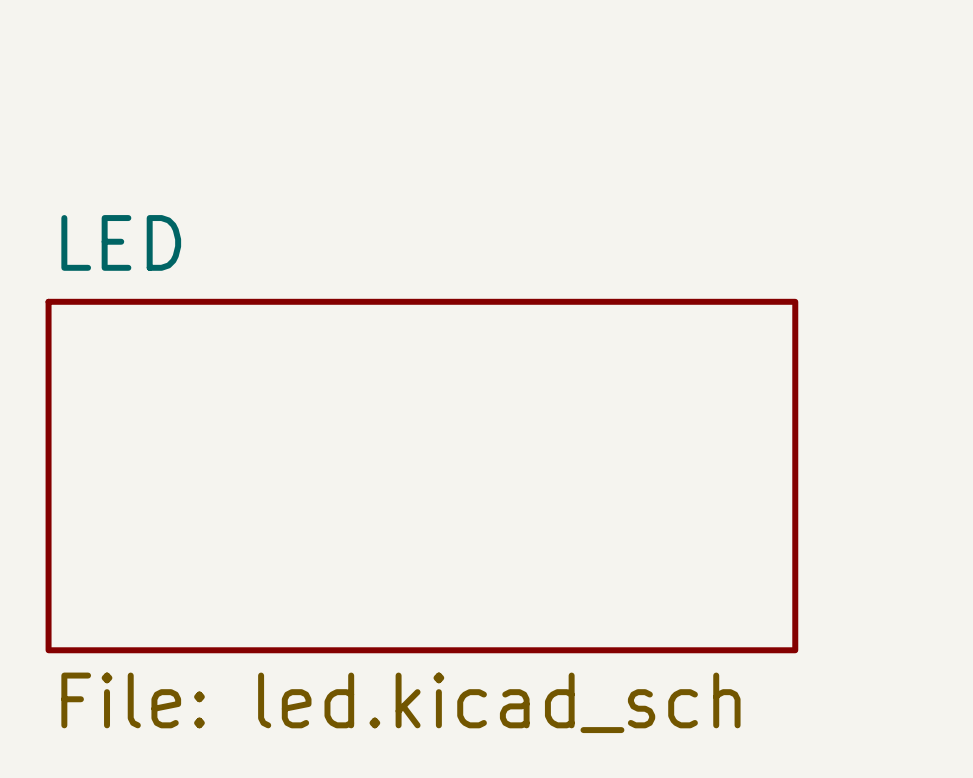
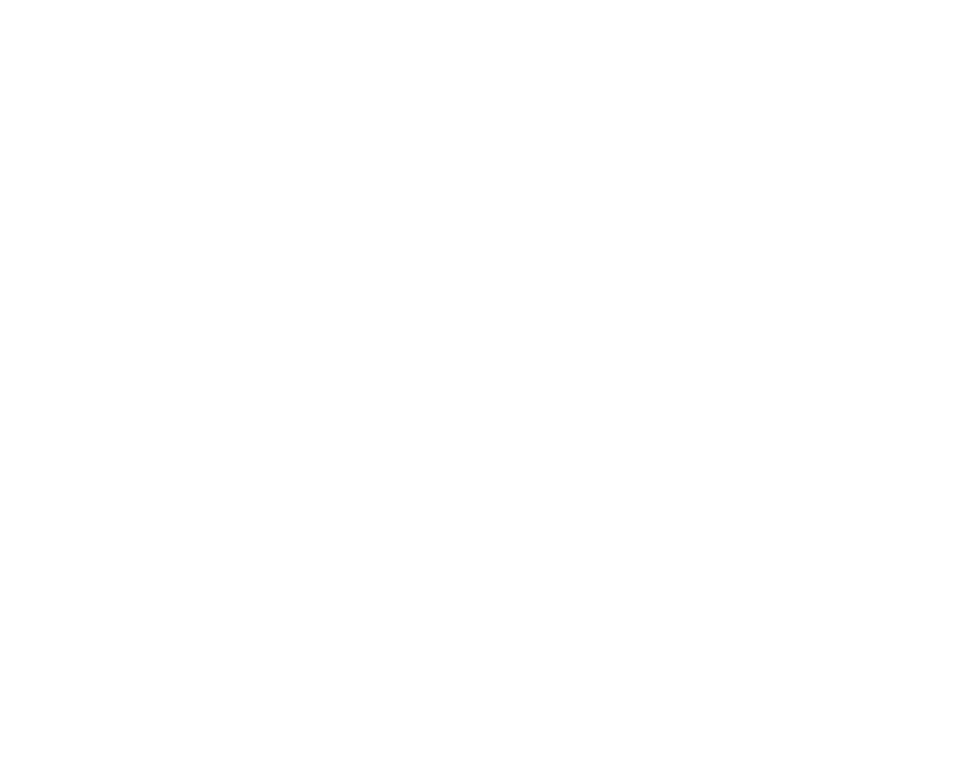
sheet LED: File: led.kicad_sch (421, 476) -> none

